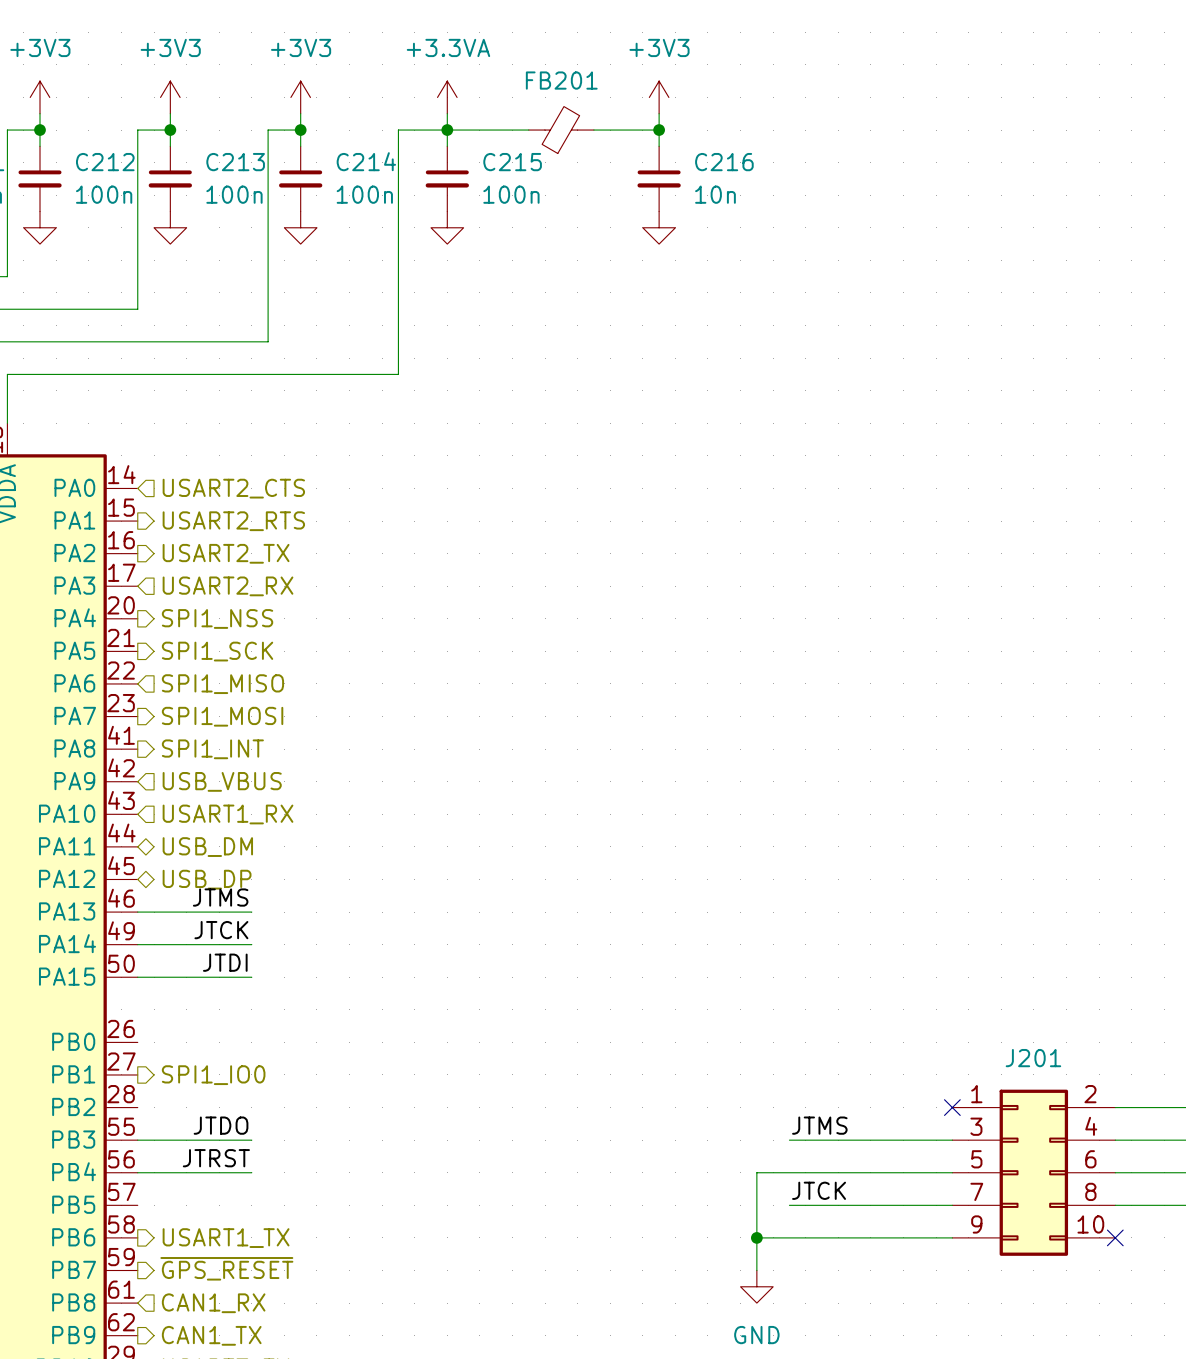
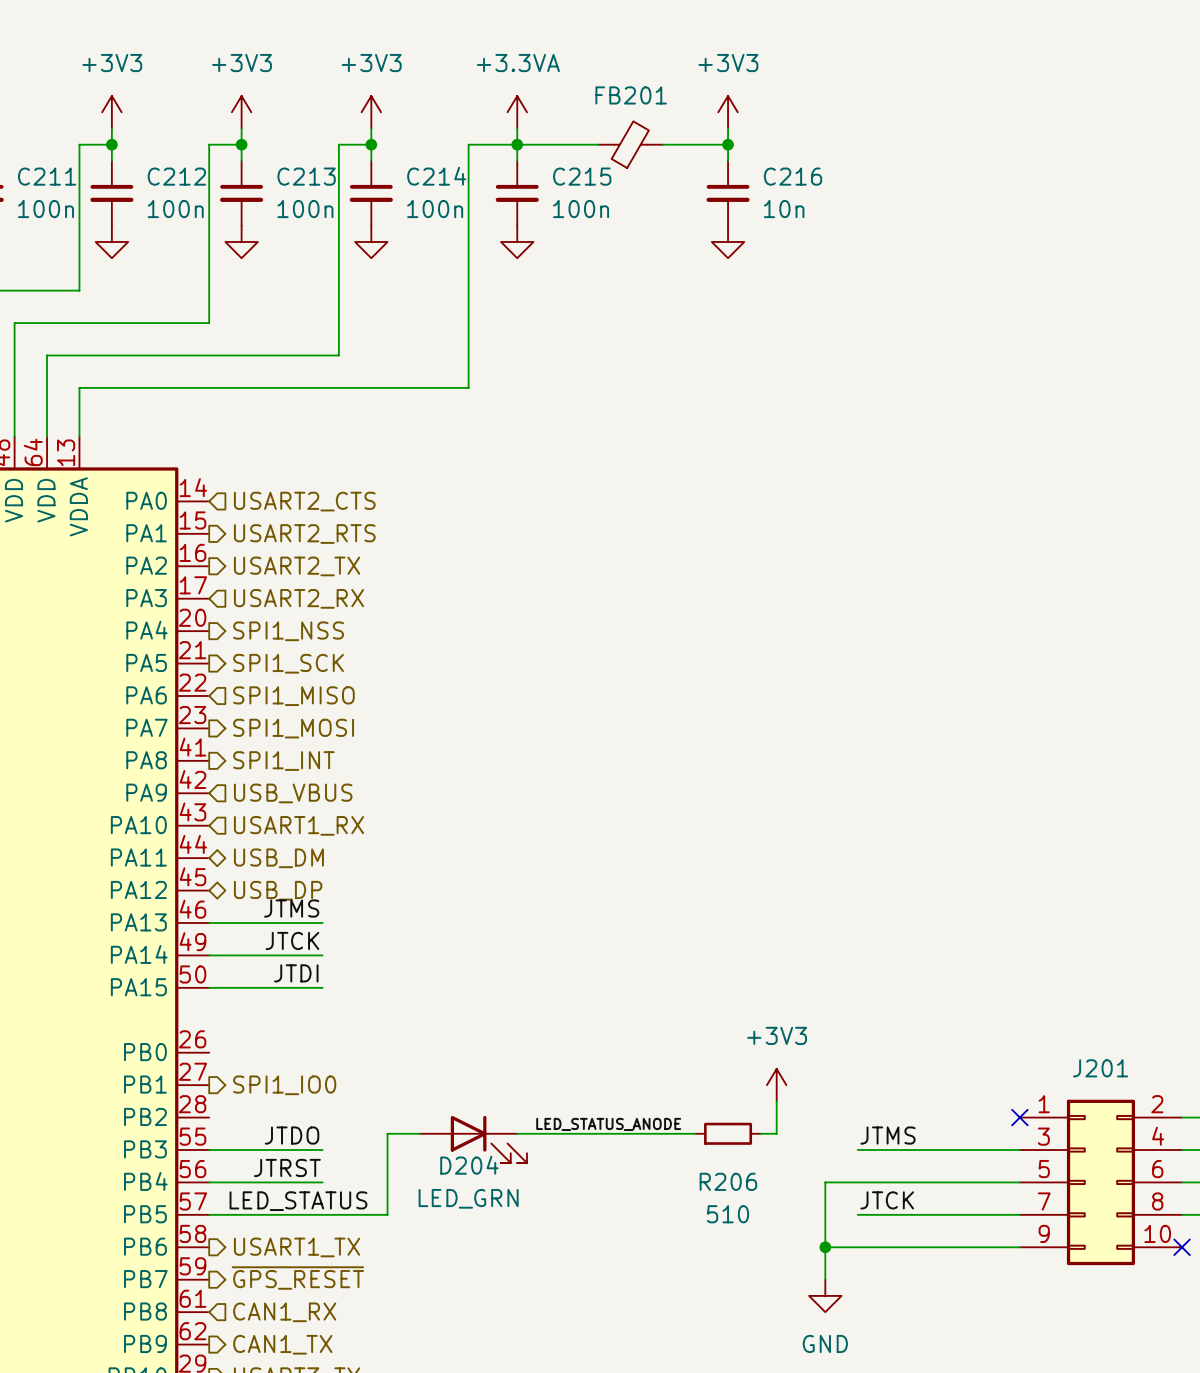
power symbol: none -> +3V3 (776, 1085)
wire: none -> (776, 1101) (776, 1133) (760, 1133)
label: none -> LED_STATUS_ANODE (608, 1124)
wire: none -> (419, 1133) (387, 1133) (387, 1214) (209, 1214)
wire: none -> (517, 1133) (695, 1133)
R206: none -> (728, 1133)
D204: none -> LED_GRN (473, 1139)
label: none -> LED_STATUS (298, 1201)

